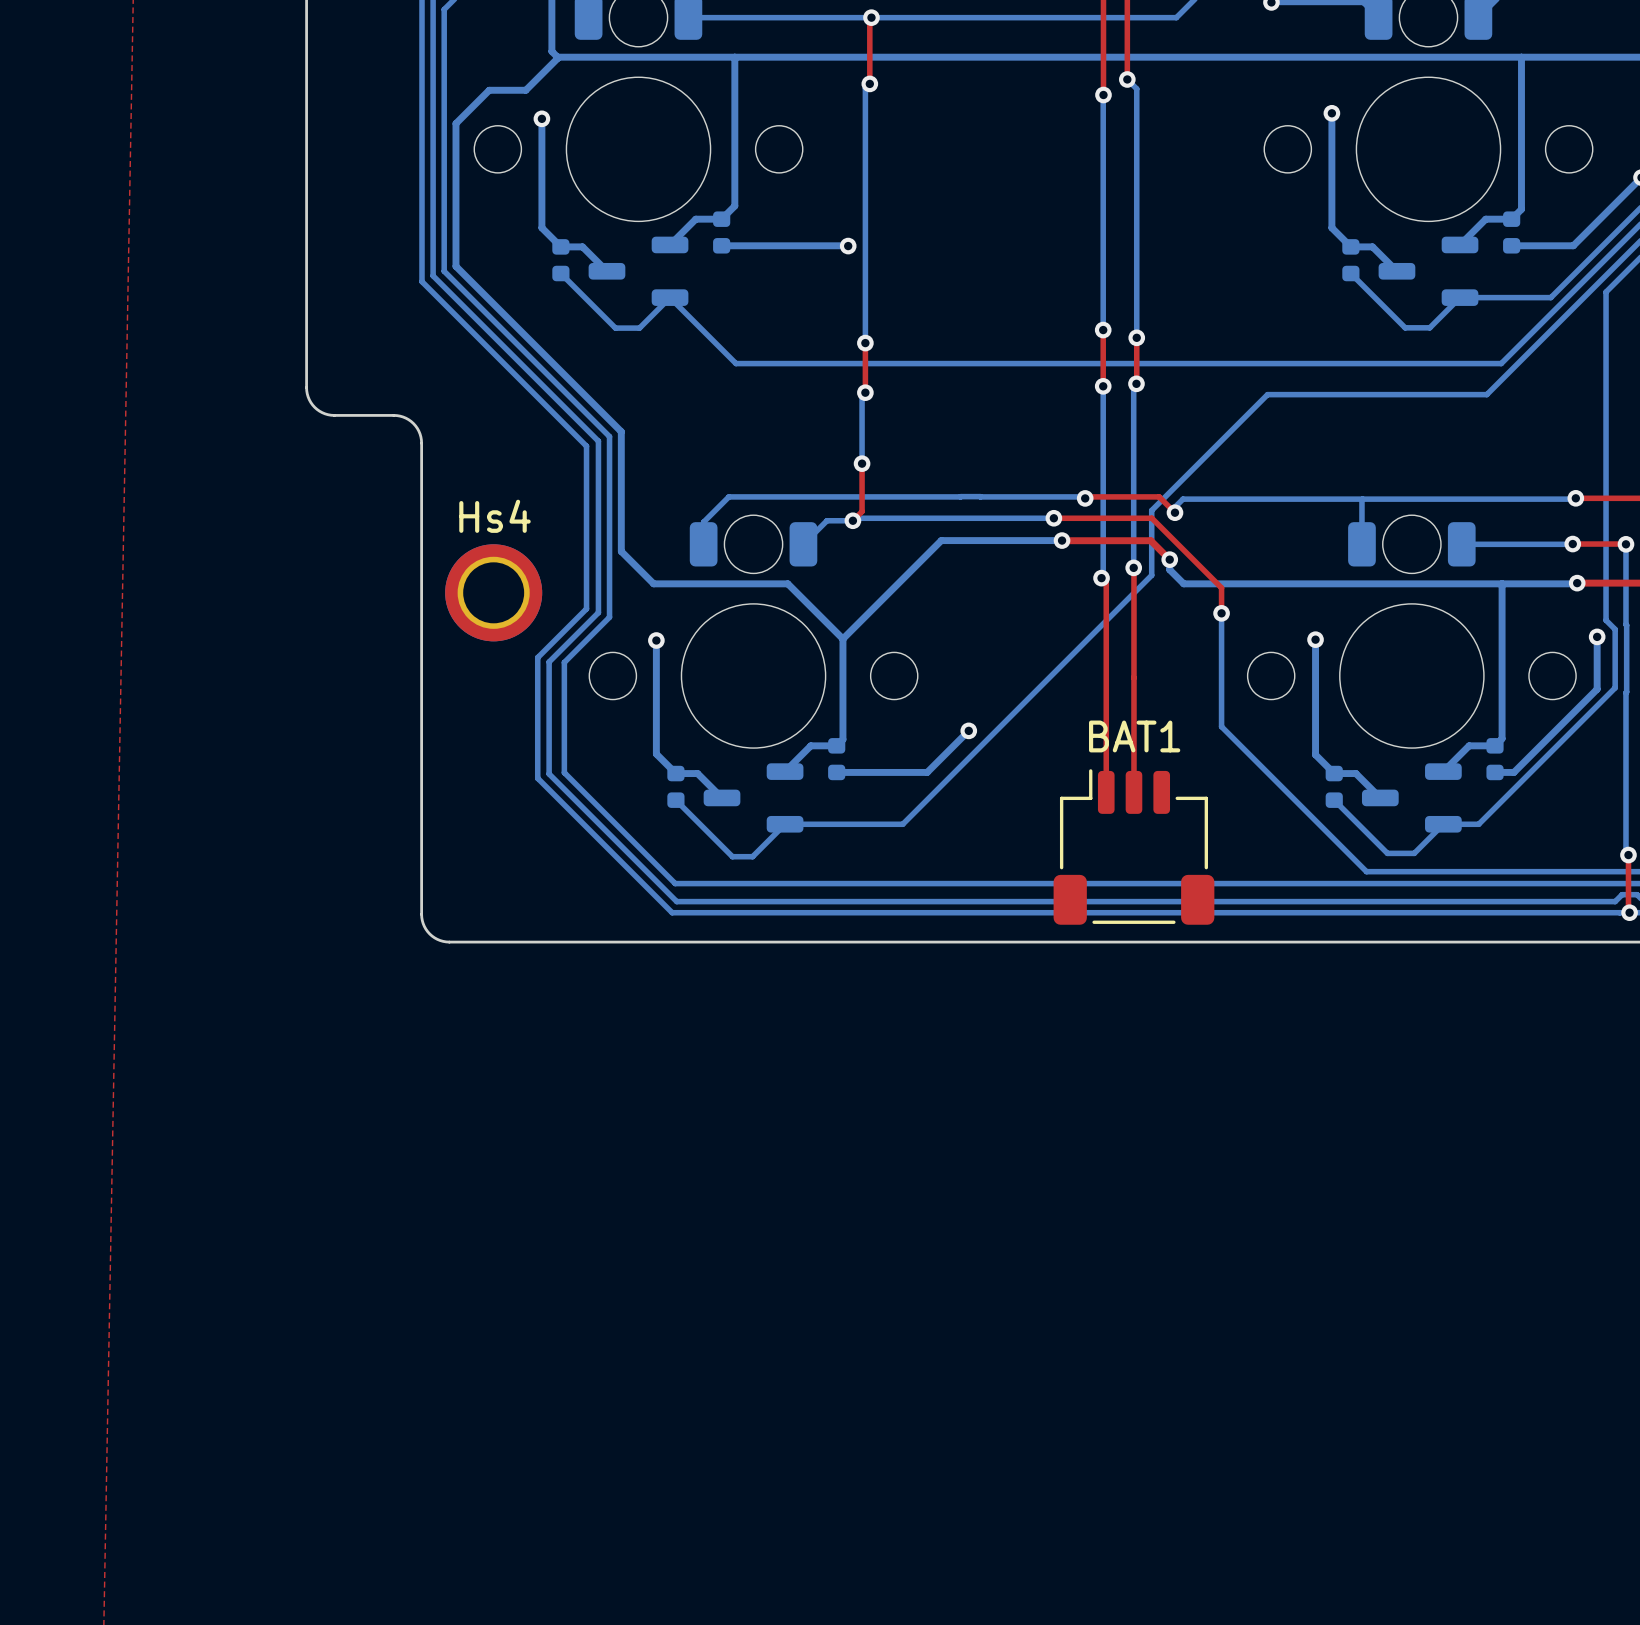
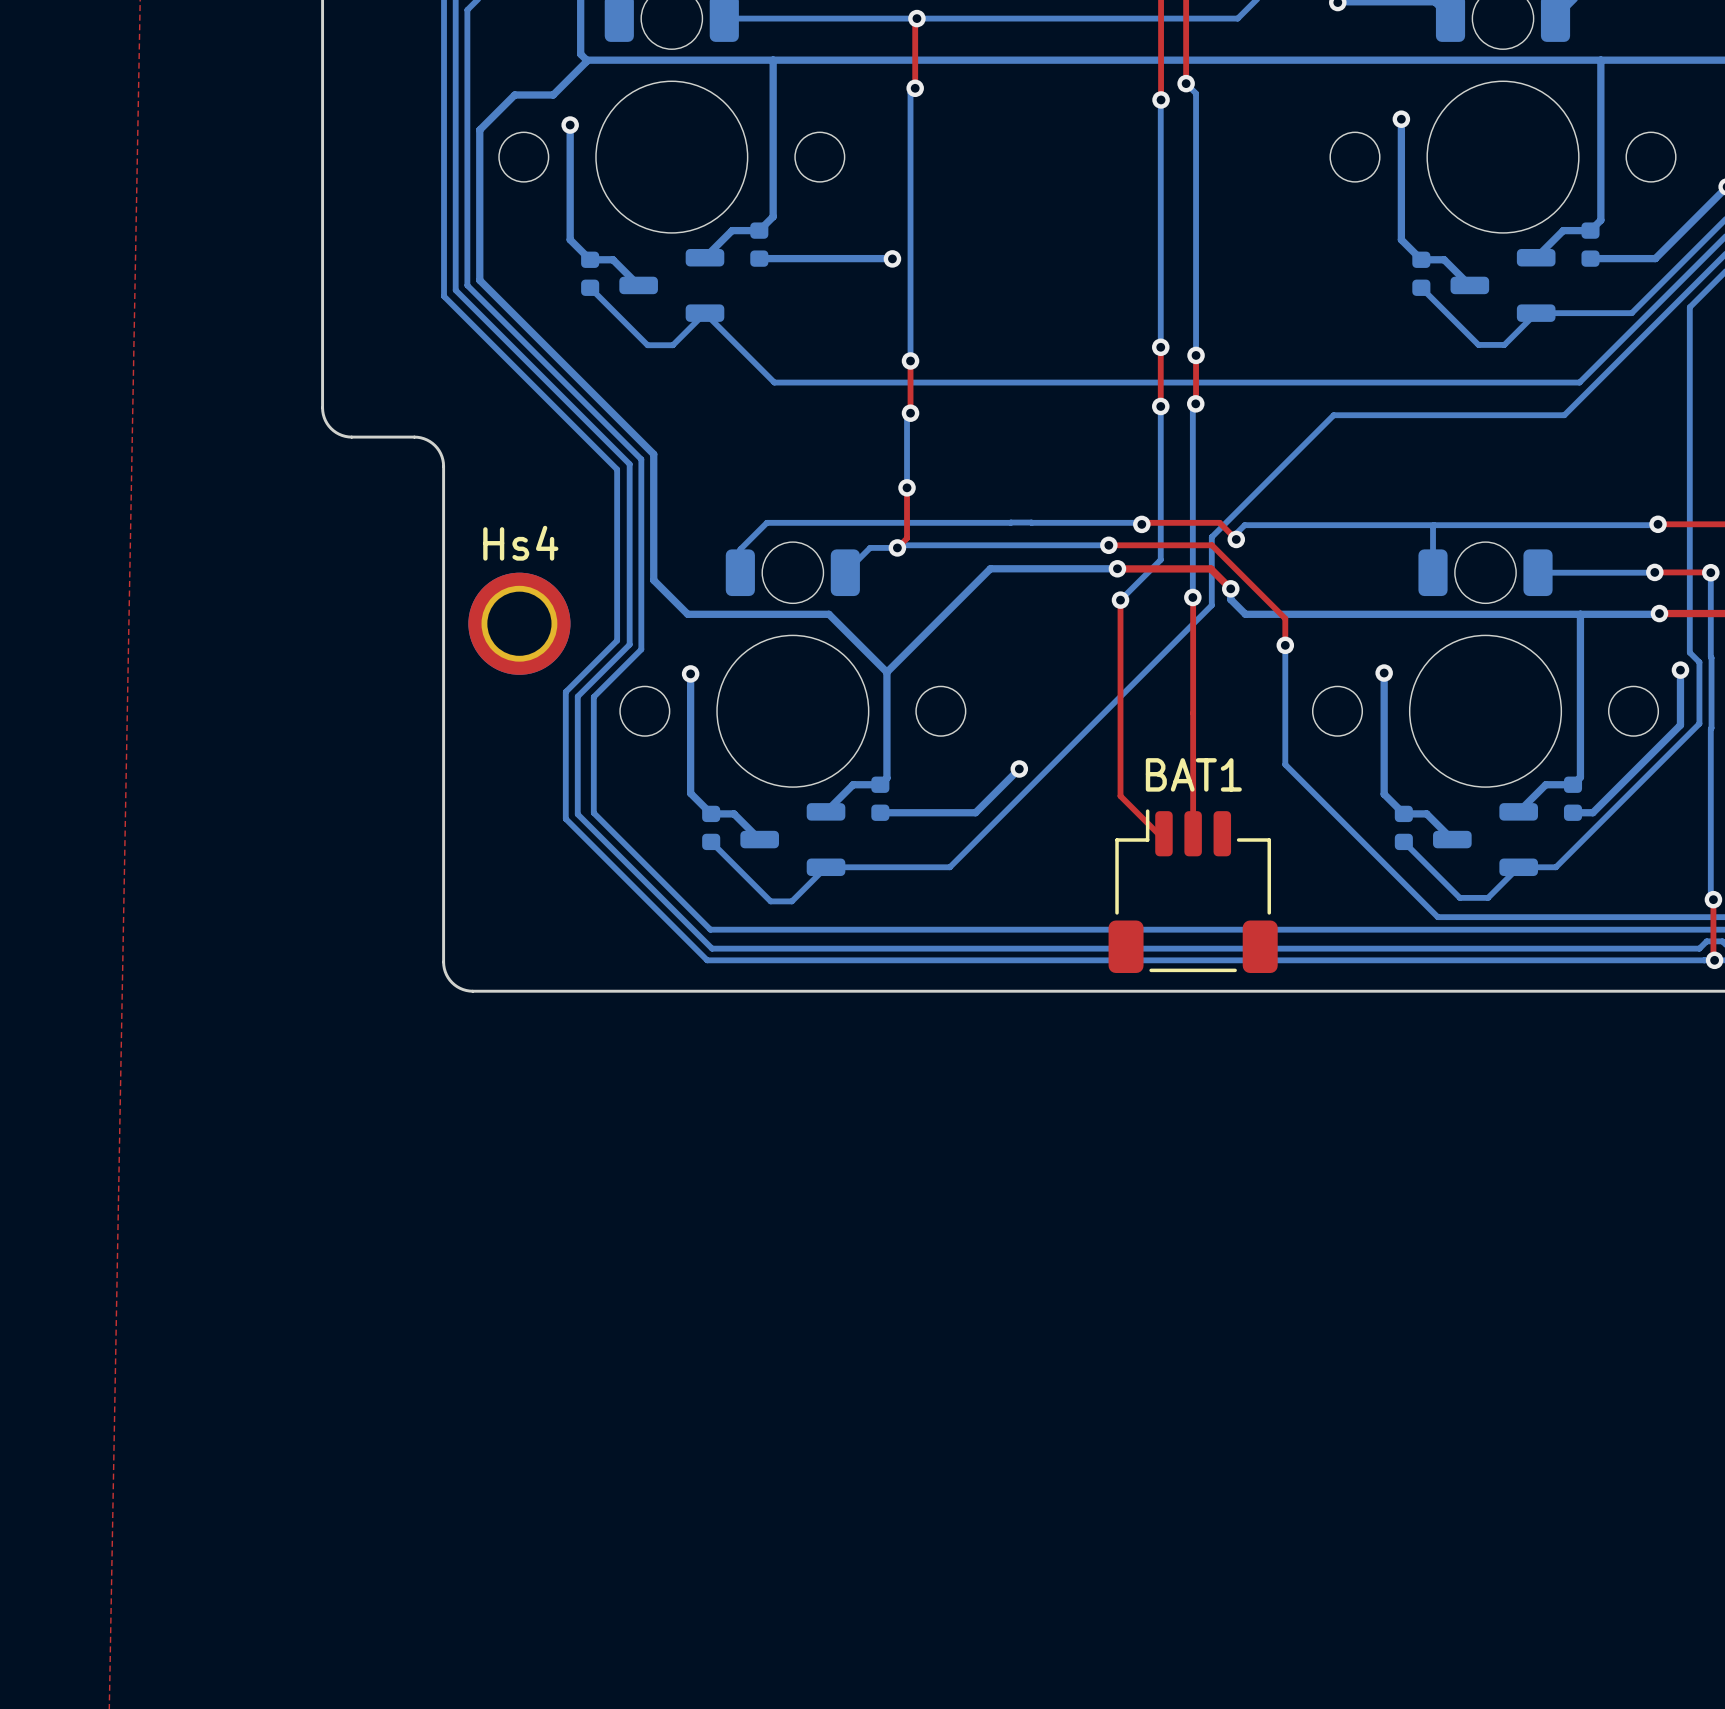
bottom track: (1103, 532) (1103, 576) (1101, 578) -> (1160, 559) (1120, 600)
top track: none -> (1120, 600) (1120, 796) (1163, 839)
top track: (1101, 578) (1106, 582) (1106, 792) -> none
via position: (1101, 578) -> (1120, 600)

